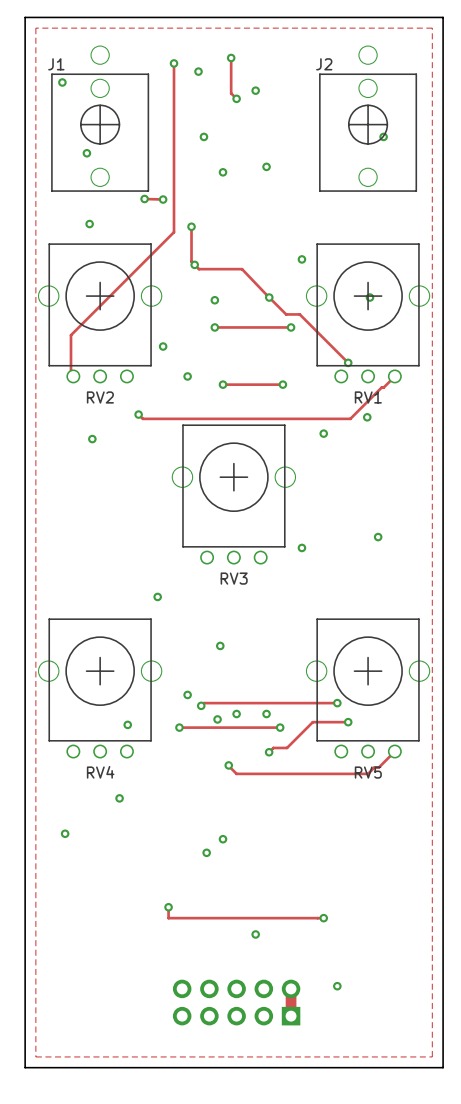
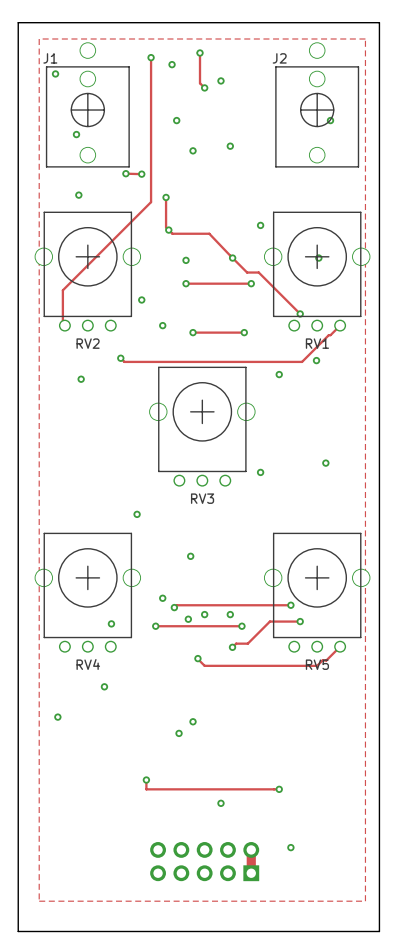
board edge: (25, 17) (25, 1067) (443, 1067) (443, 17) (25, 17) -> (18, 22) (18, 931) (379, 931) (379, 22) (18, 22)
zone outline: (35, 28) (35, 1056) (432, 1056) (432, 28) (35, 28) -> (39, 39) (39, 901) (365, 901) (365, 39) (39, 39)

